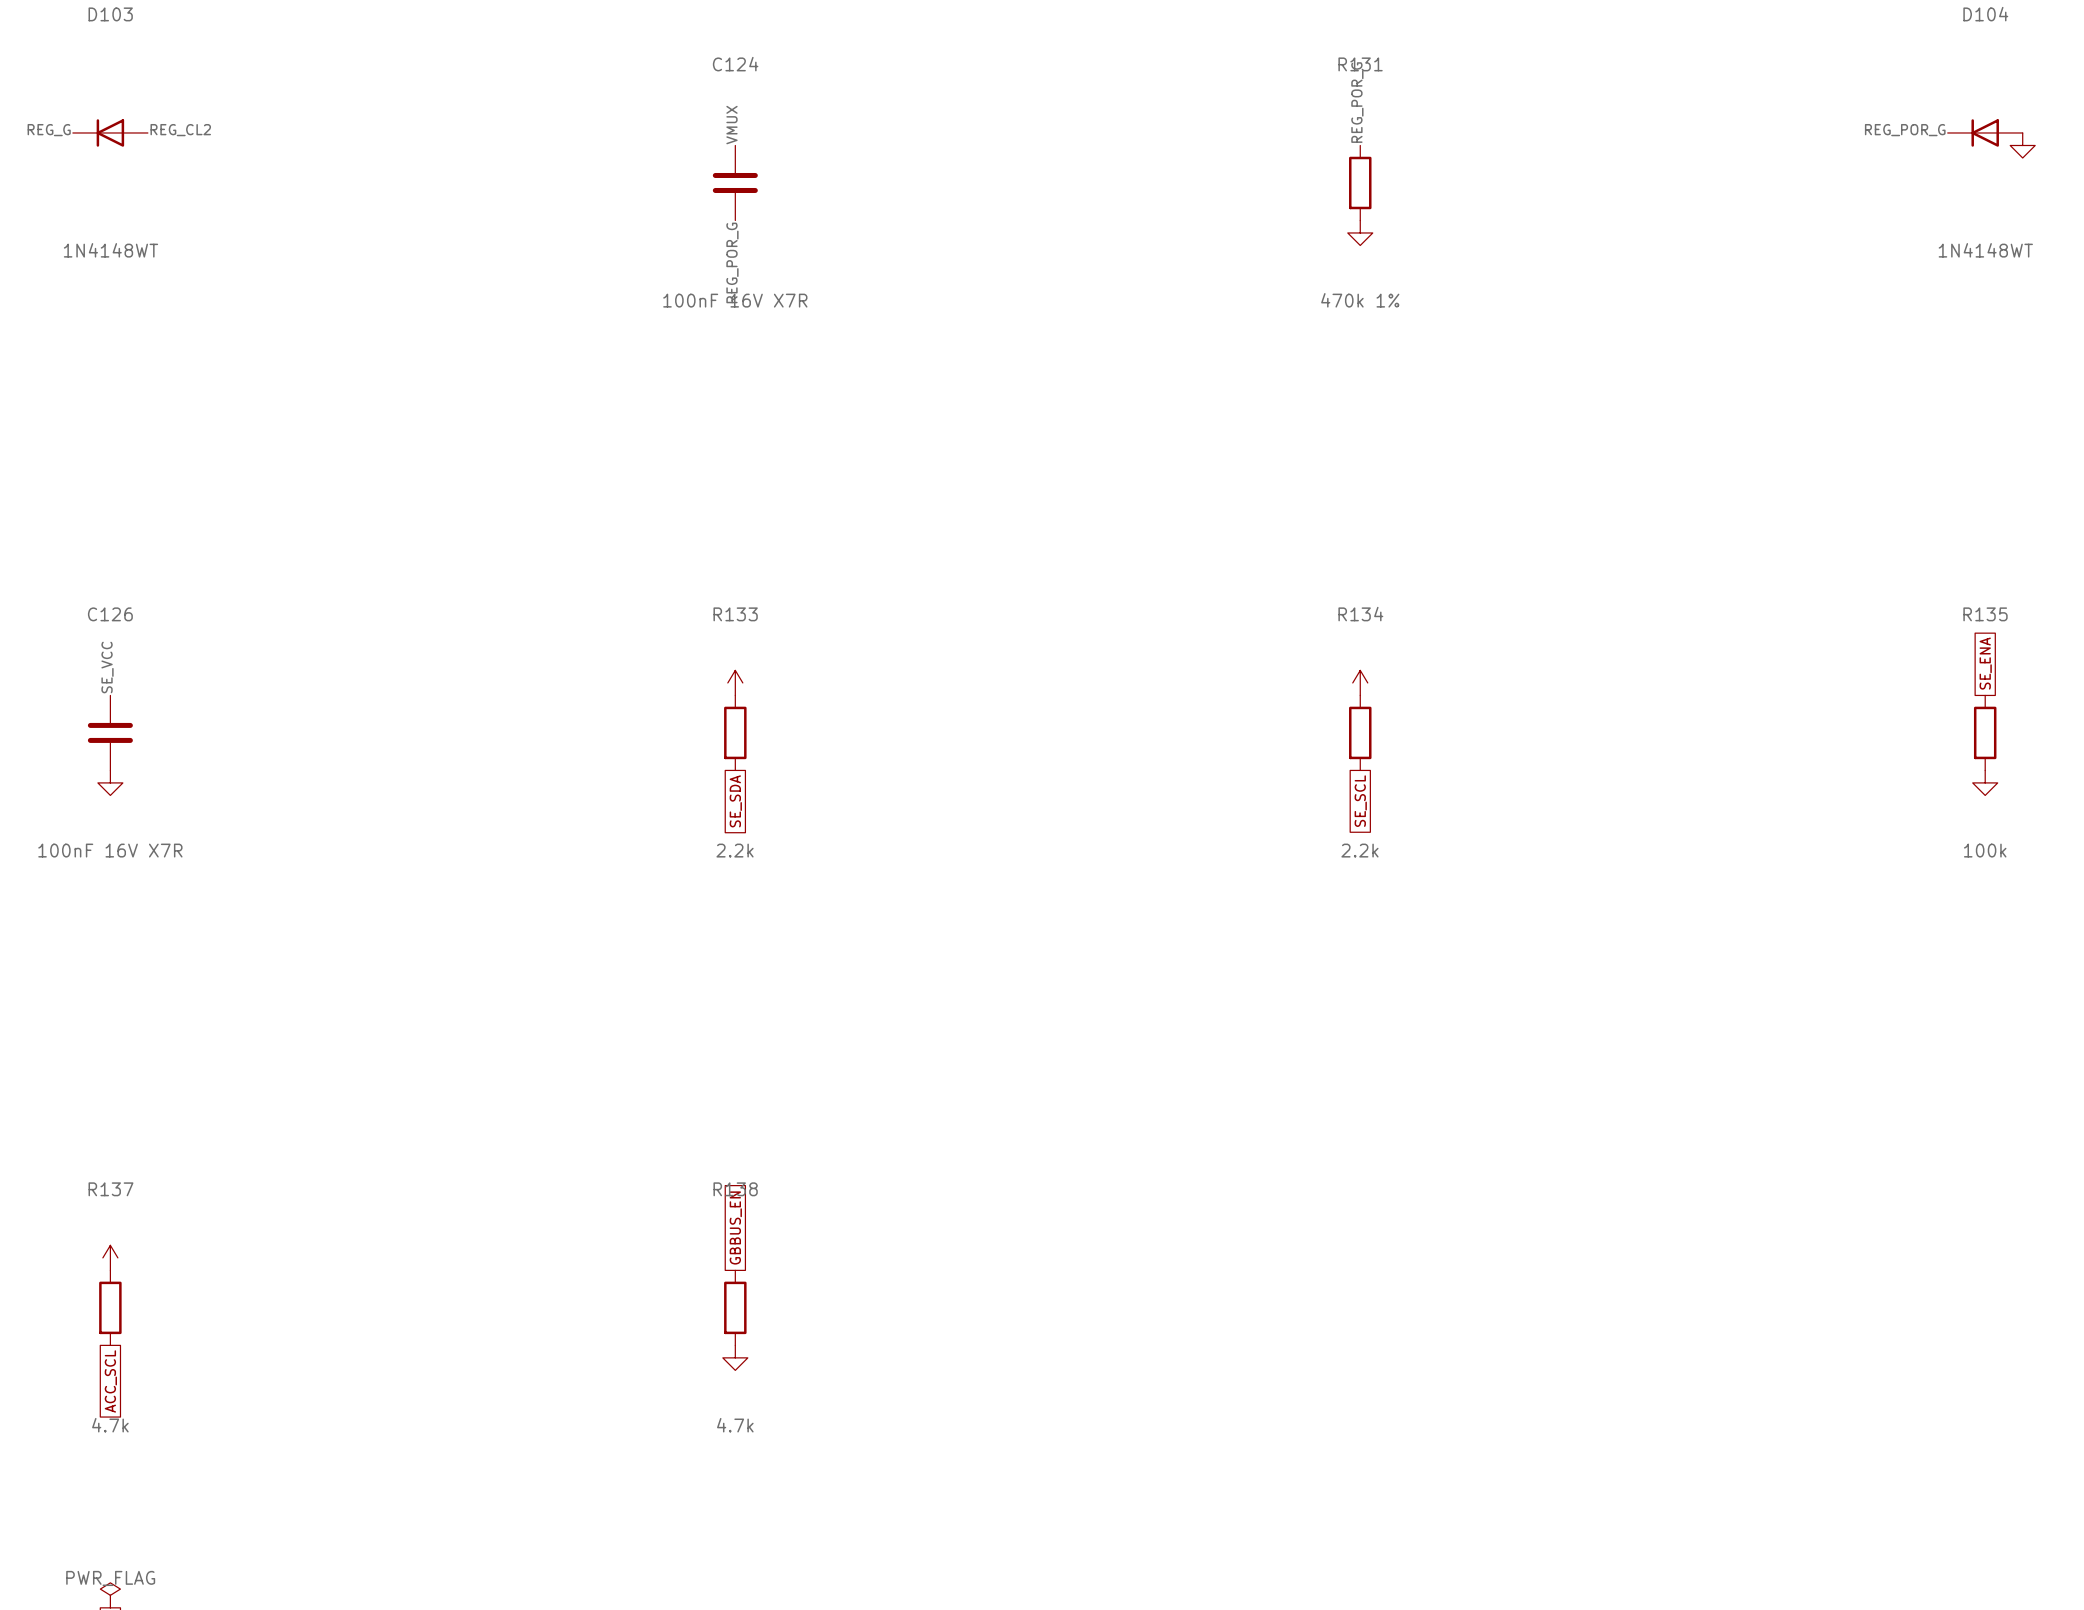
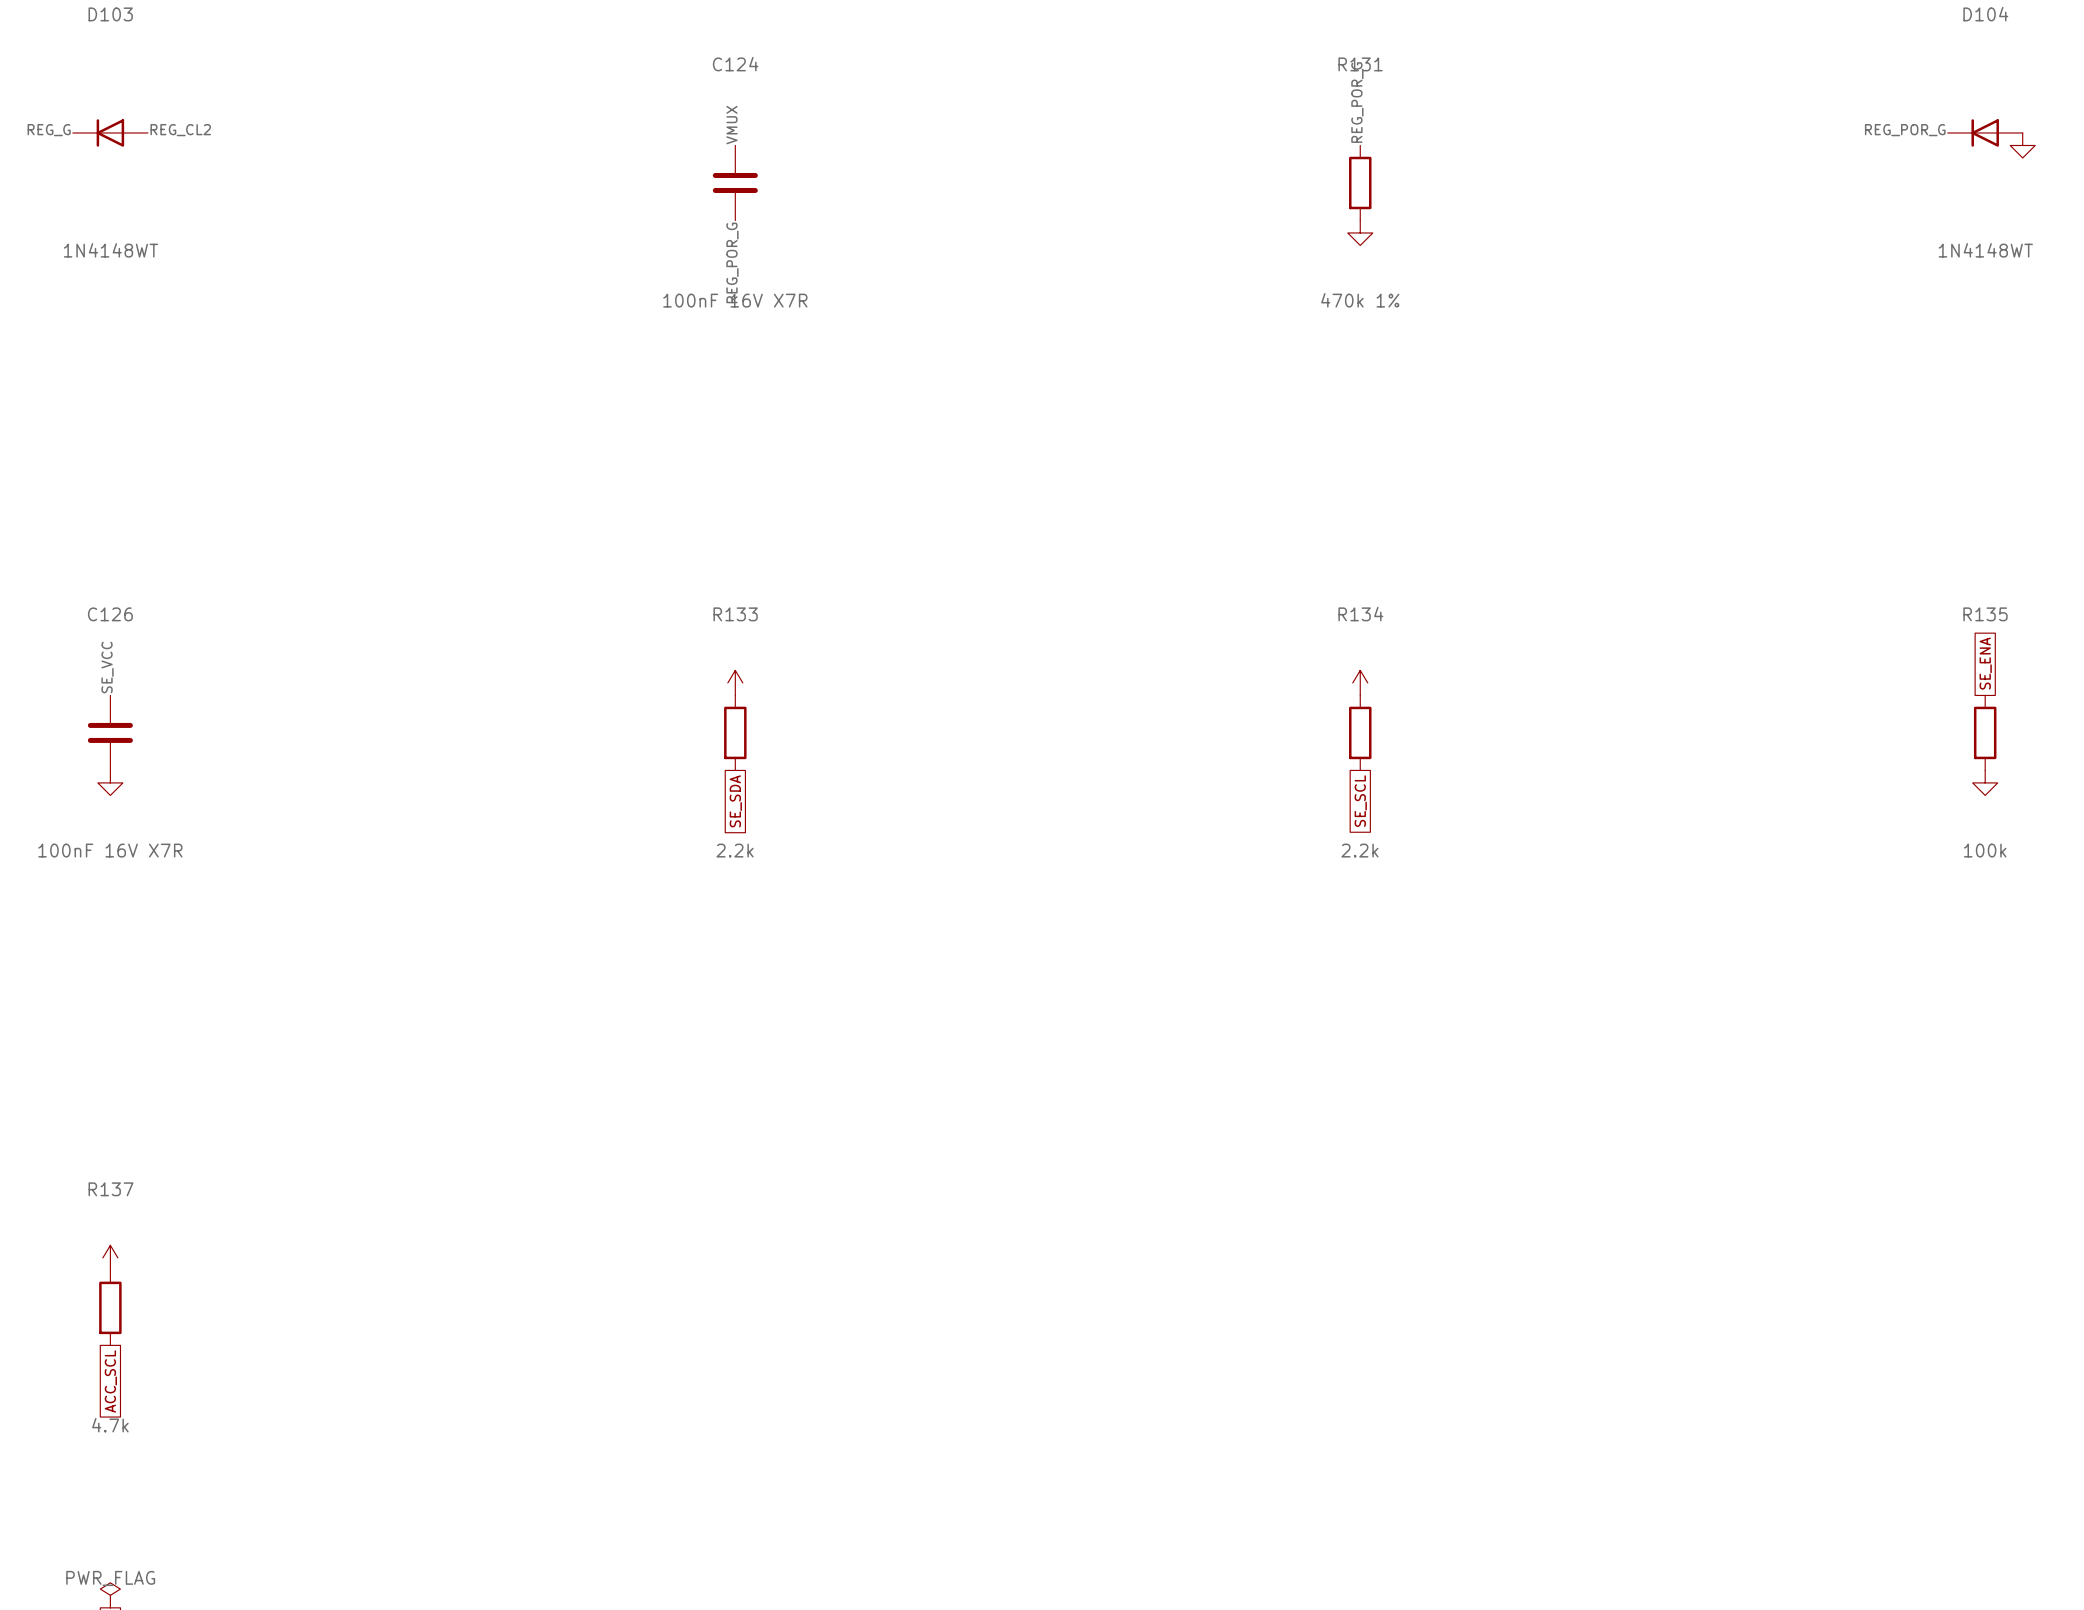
global label: GBBUS_EN (735, 1227) -> none
R138: 4.7k (735, 1307) -> none
power symbol: (735, 1357) -> none

